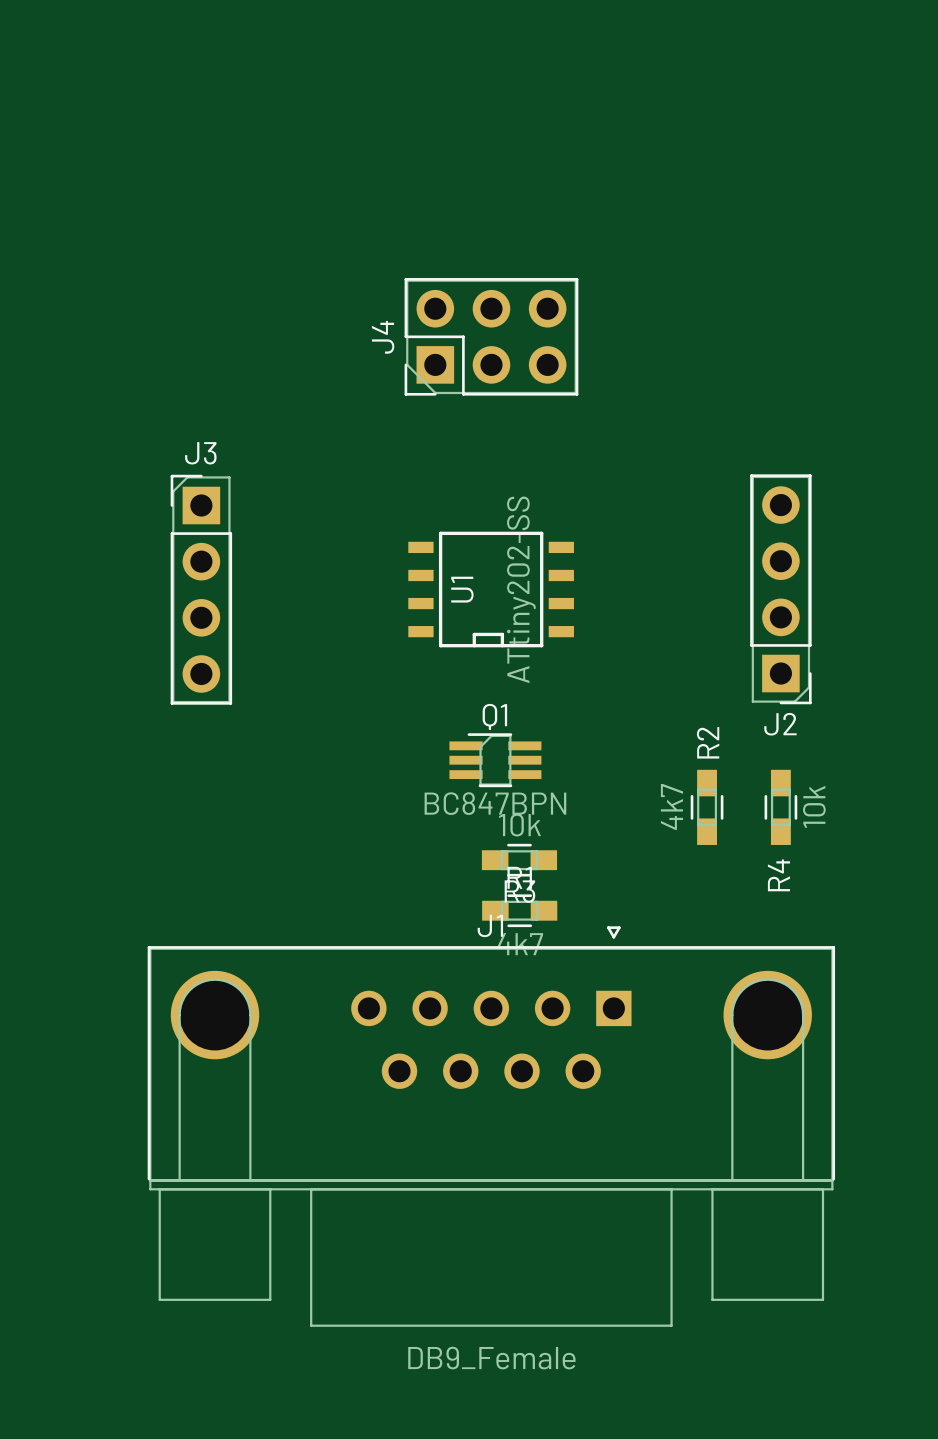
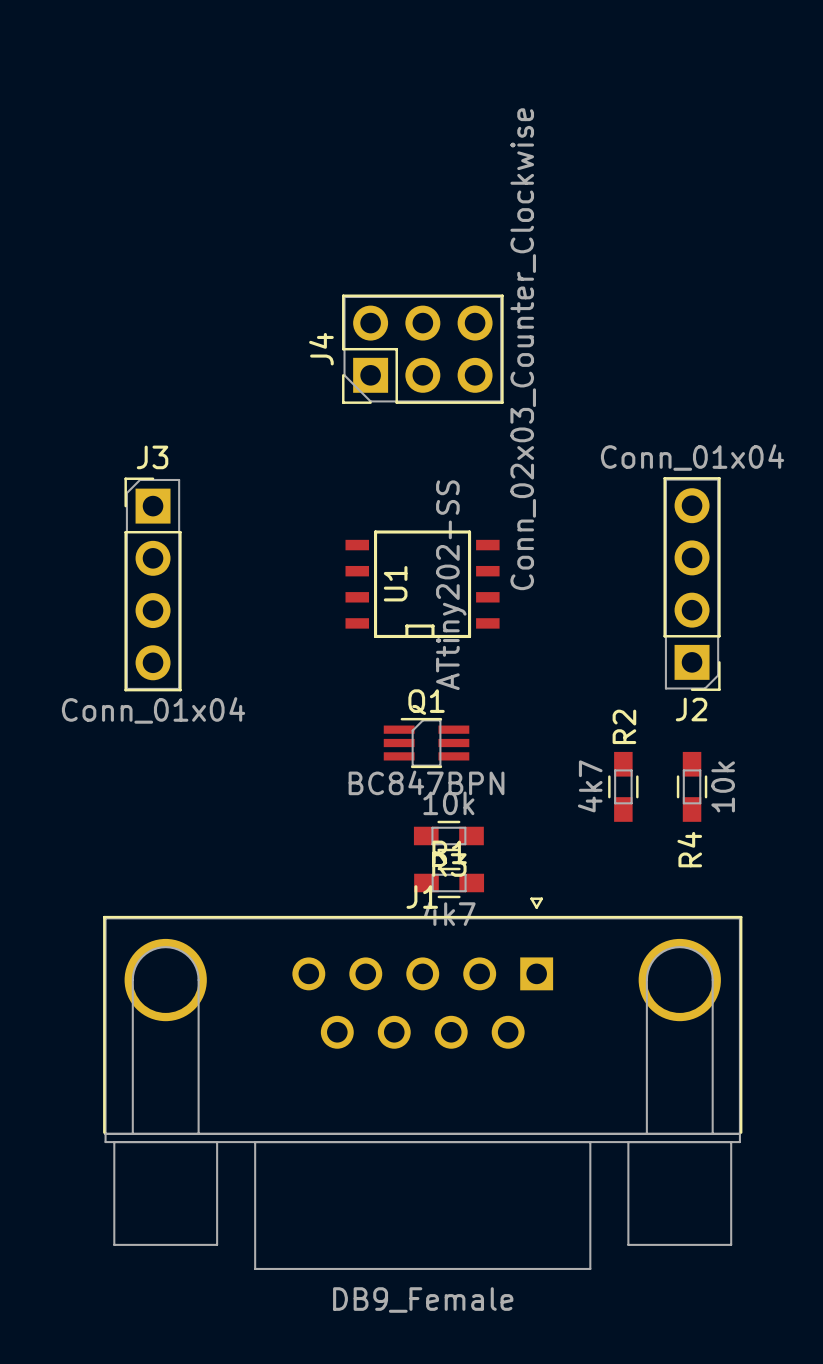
J4 value: none -> Conn_02x03_Counter_Clockwise (523, 349)
J2 value: none -> Conn_01x04 (692, 457)
J3 value: none -> Conn_01x04 (153, 710)

